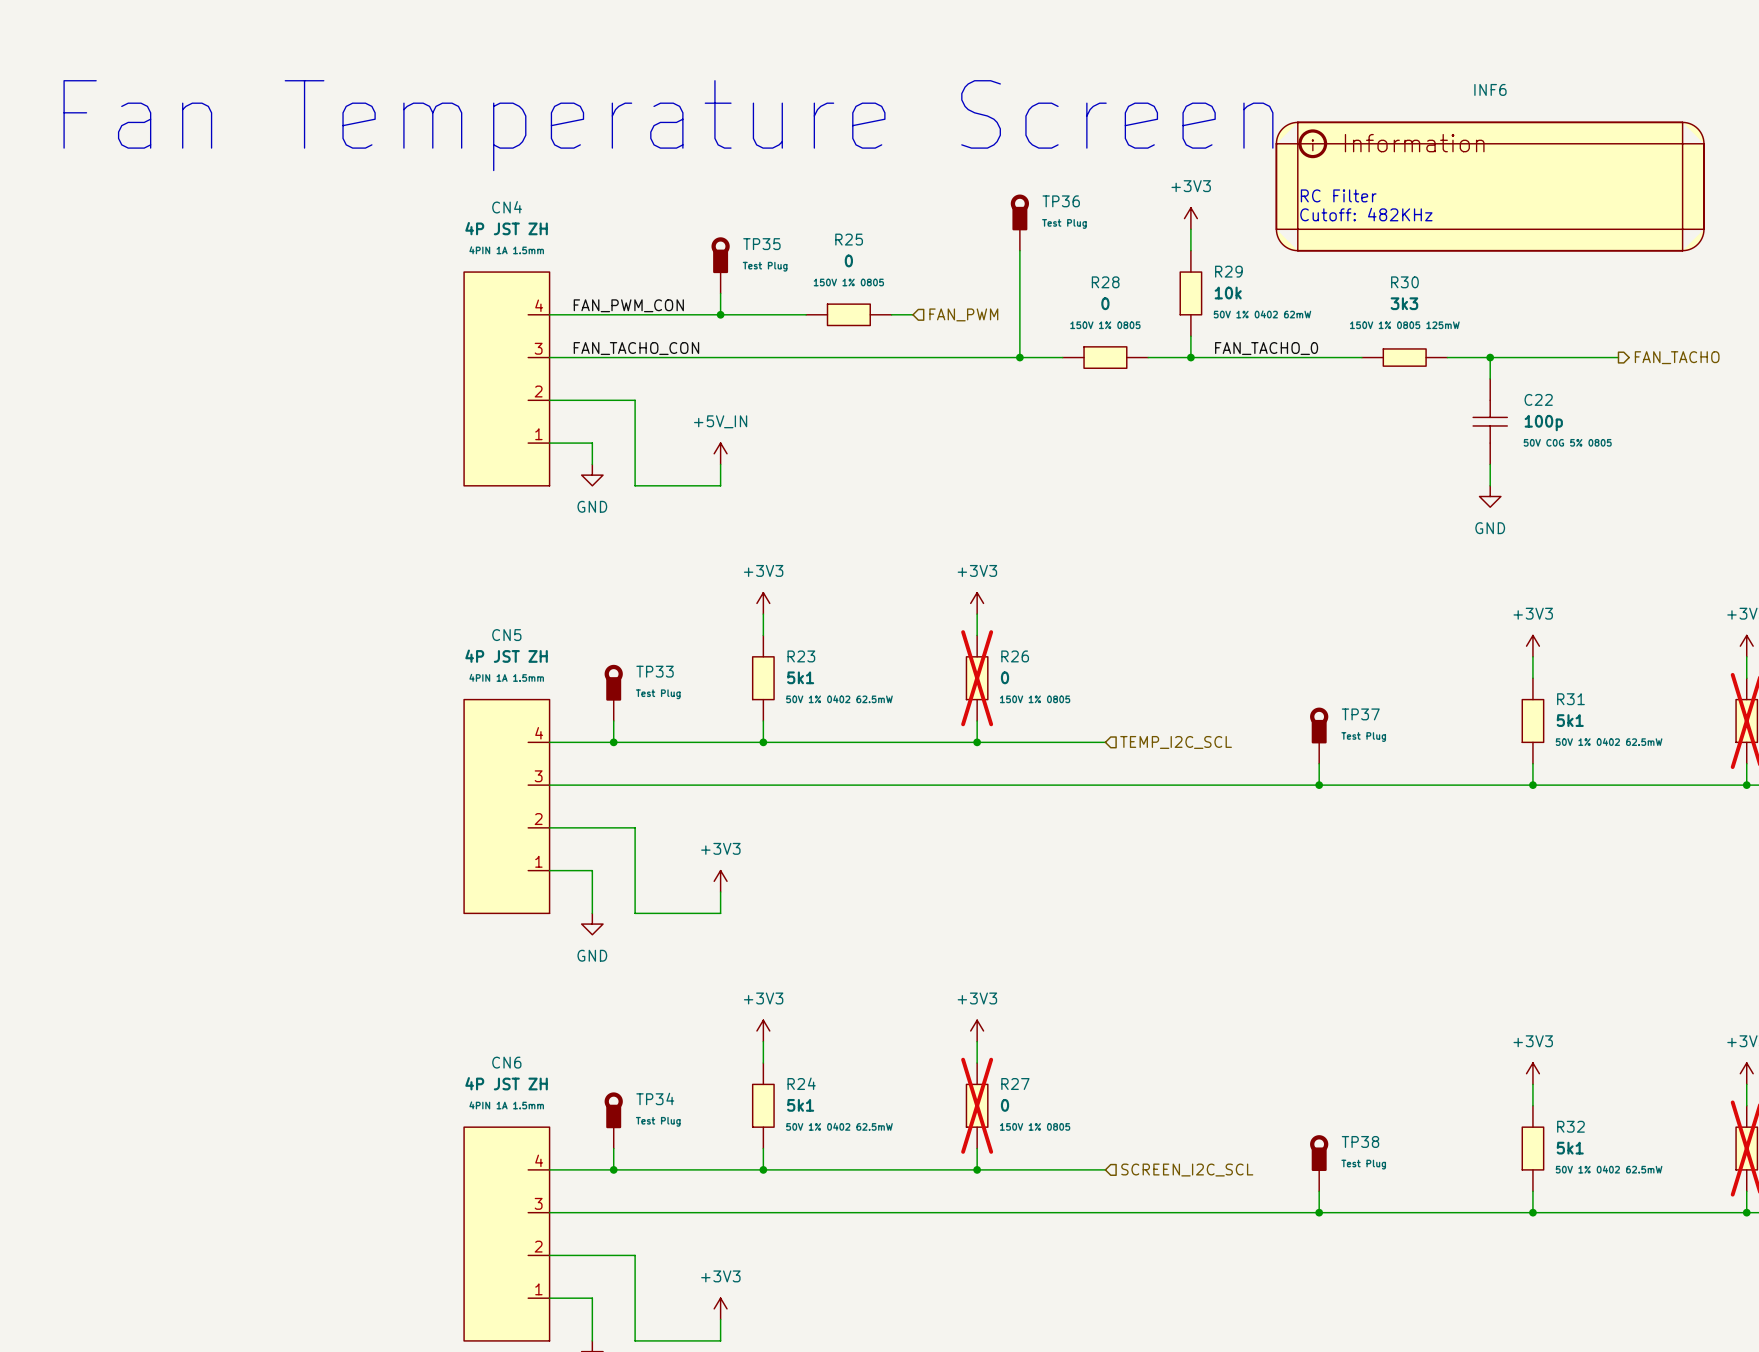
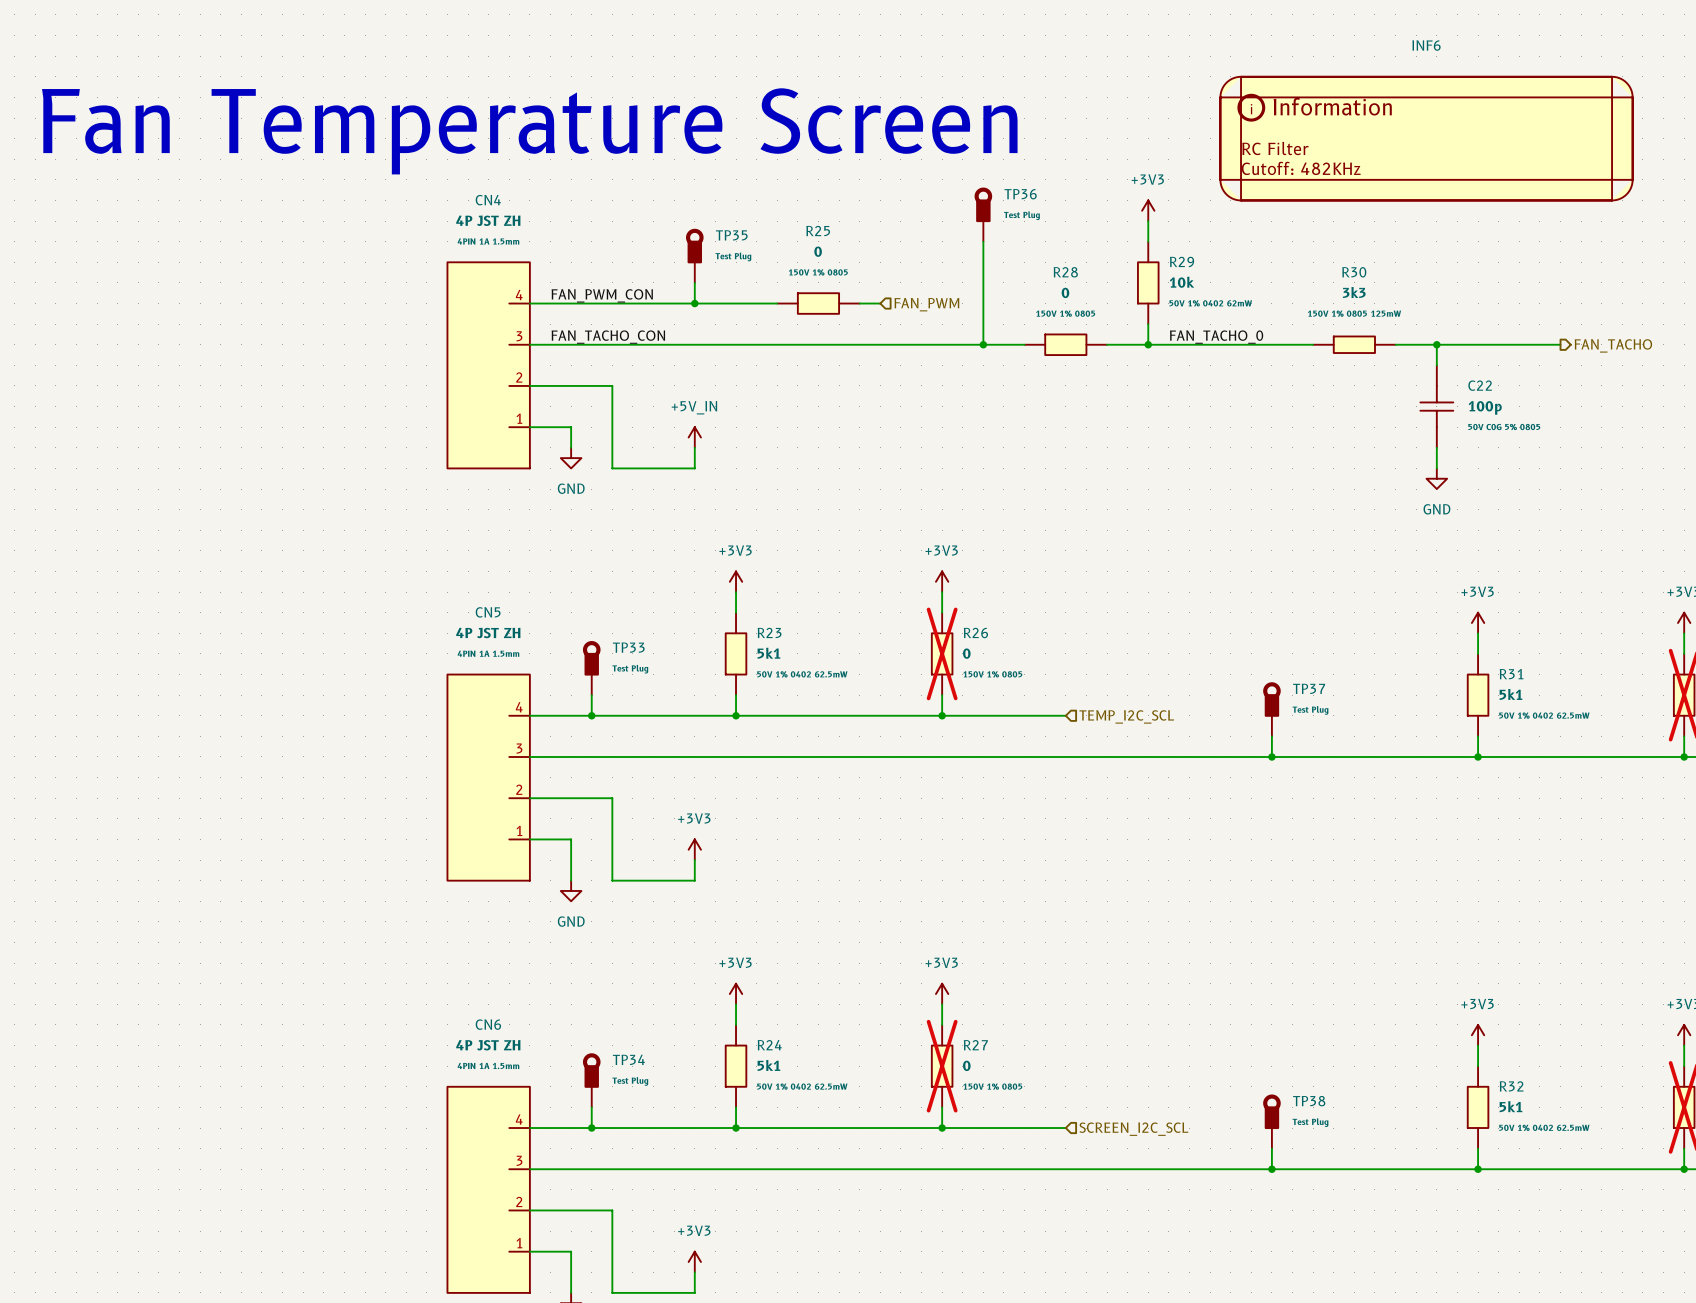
INF6 symbol: [1276, 122, 1704, 251] -> [1220, 76, 1633, 201]
text position: Fan Temperature Screen (668, 125) -> Fan Temperature Screen (529, 131)
text: RC Filter (1338, 195) -> none
text: Cutoff: 482KHz (1366, 214) -> none

